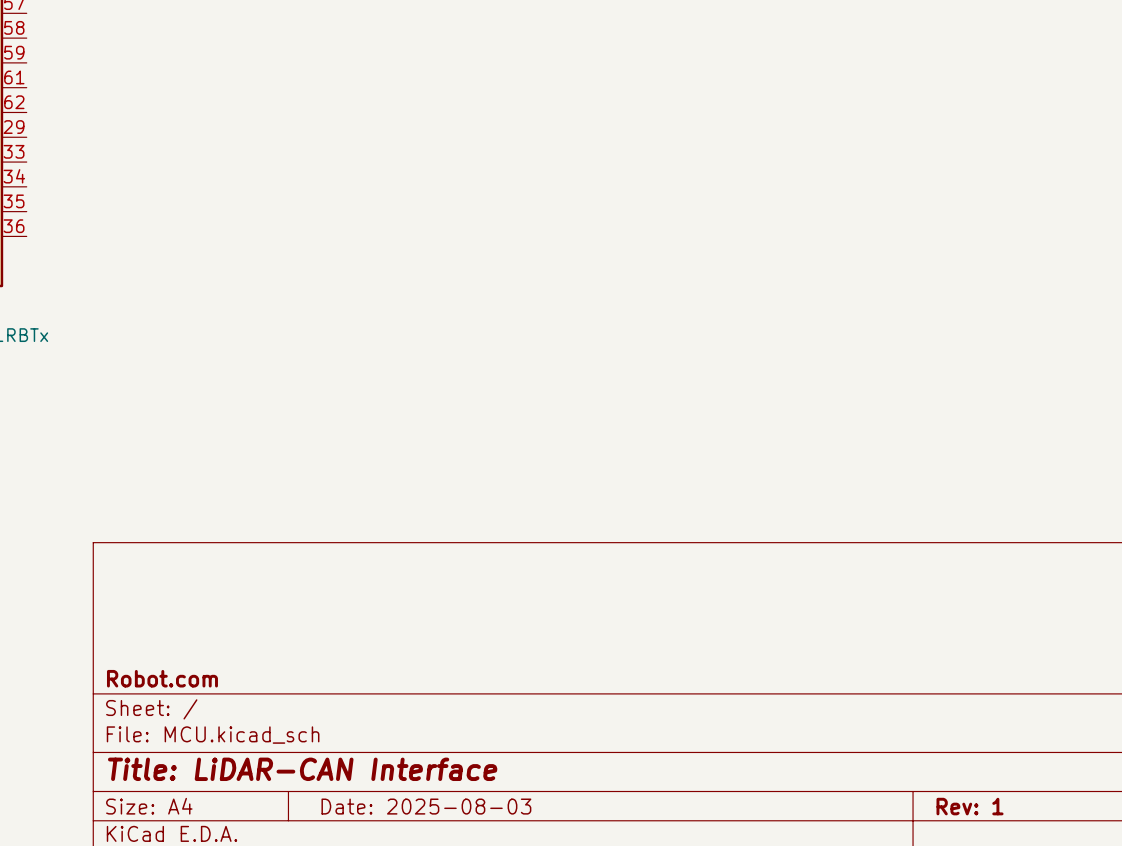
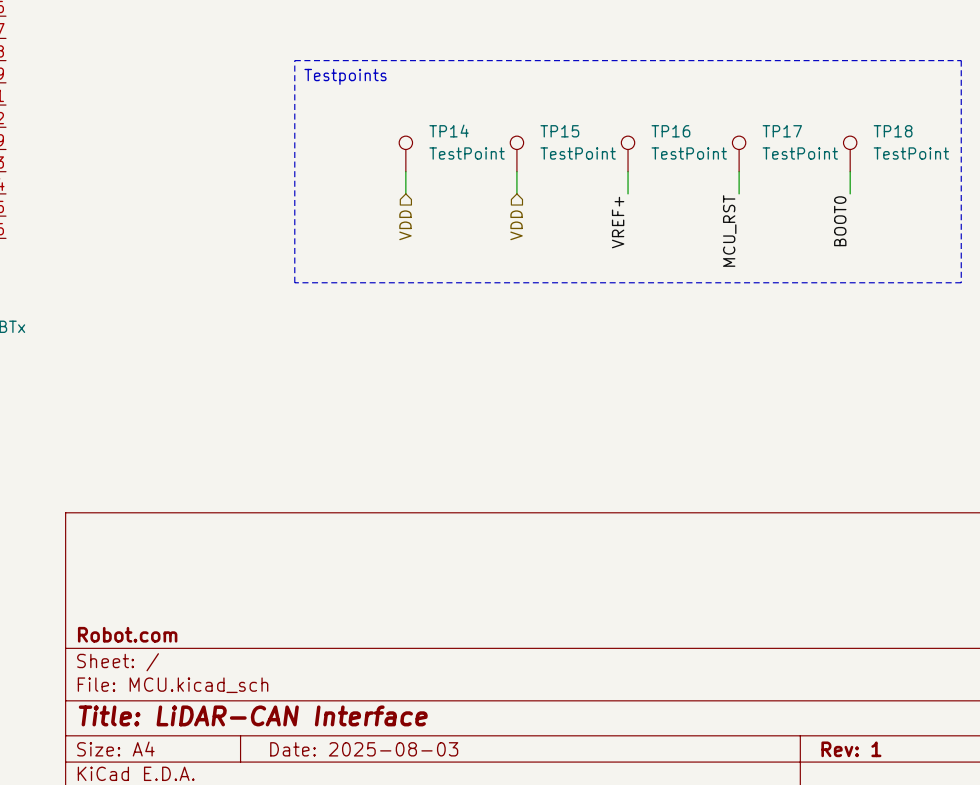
line: none -> (294, 60) (961, 60) (961, 282) (294, 282) (294, 60)
text: none -> Testpoints (345, 76)
TP14: none -> TestPoint (405, 153)
TP15: none -> TestPoint (516, 153)
TP16: none -> TestPoint (628, 153)
TP17: none -> TestPoint (739, 153)
TP18: none -> TestPoint (850, 153)
wire: none -> (405, 171) (405, 193)
wire: none -> (516, 171) (516, 193)
wire: none -> (628, 171) (628, 193)
wire: none -> (739, 171) (739, 193)
wire: none -> (850, 171) (850, 193)
label: none -> BOOT0 (840, 221)
label: none -> VREF+ (618, 222)
hierarchical label: none -> VDD (405, 225)
hierarchical label: none -> VDD (516, 225)
label: none -> MCU_RST (729, 231)

